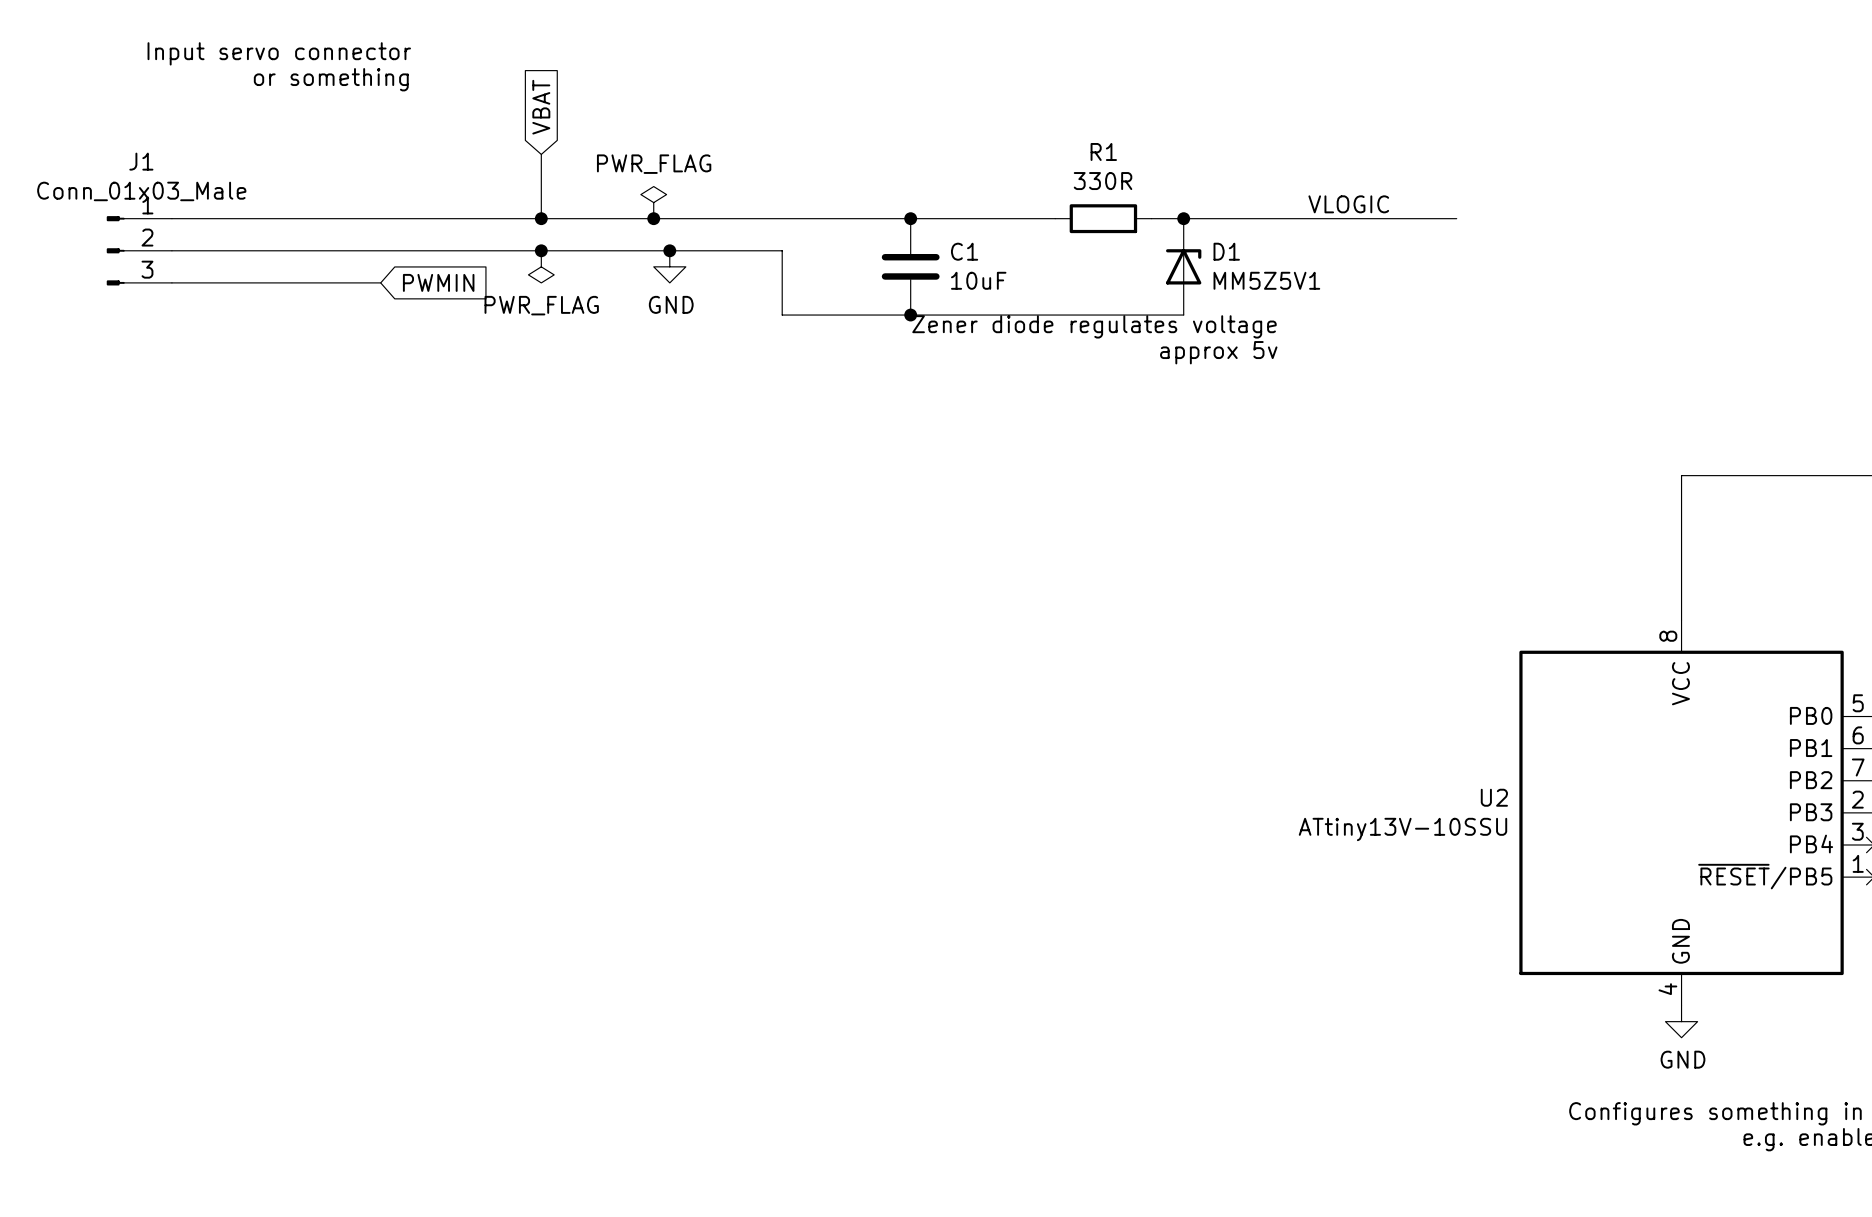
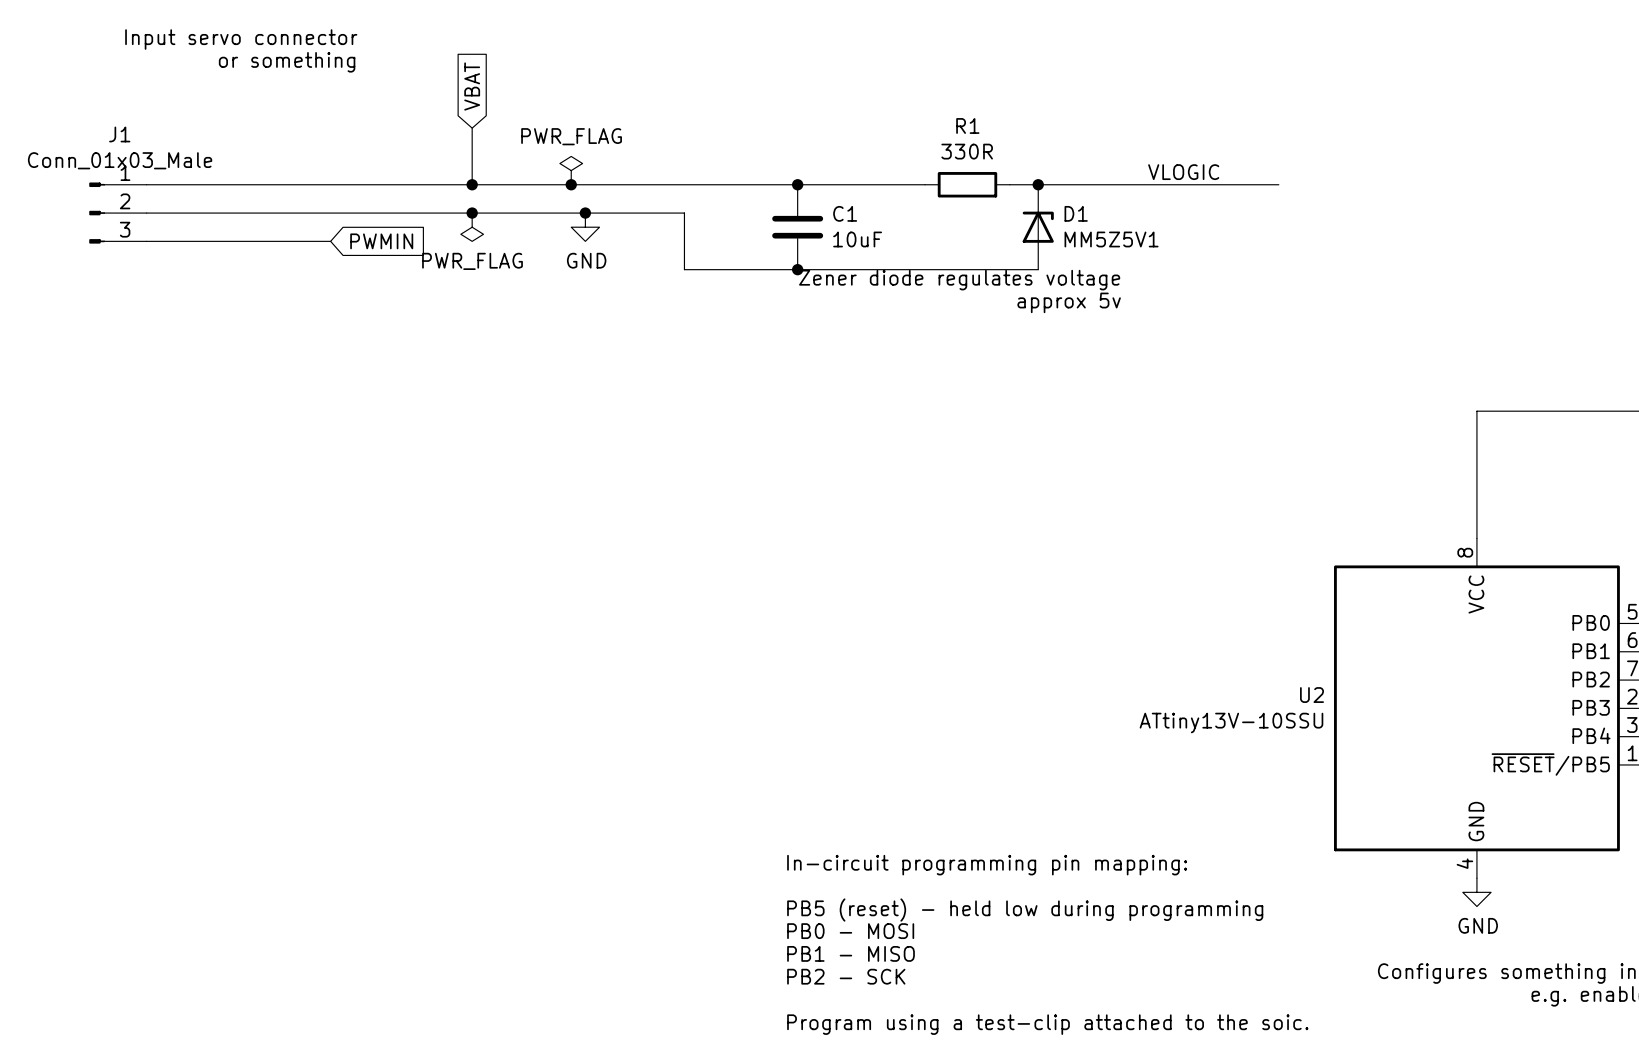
text: none -> In-circuit programming pin mapping: (987, 865)
text: none -> PB5 (reset) - held low during programming (1025, 910)
text: none -> PB0 - MOSI (850, 931)
text: none -> PB1 - MISO (851, 953)
text: none -> PB2 - SCK (846, 976)
text: none -> Program using a test-clip attached to the soic. (1047, 1024)

